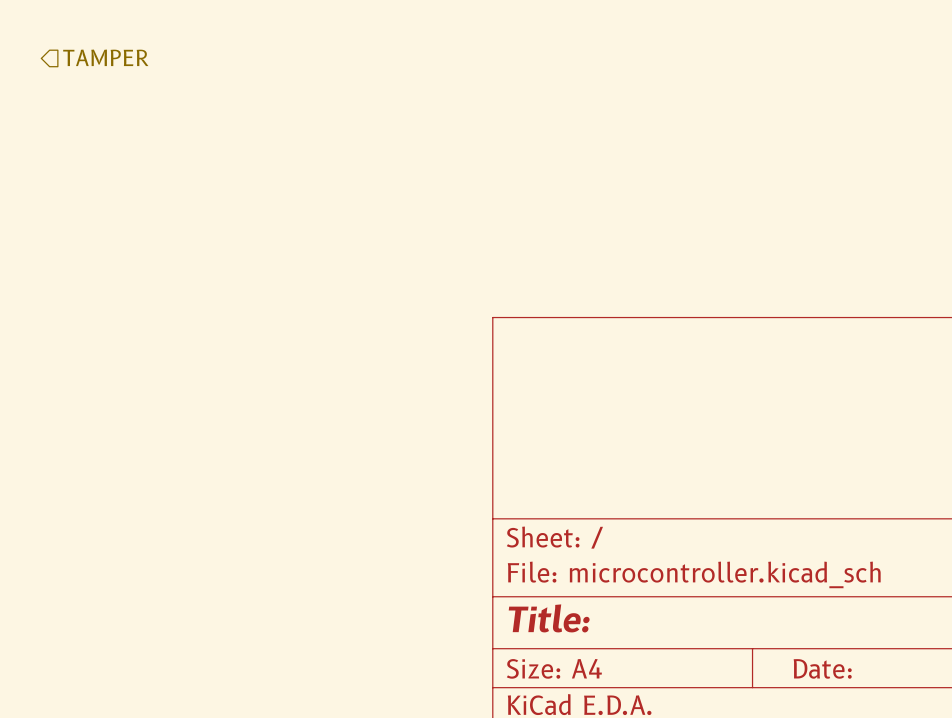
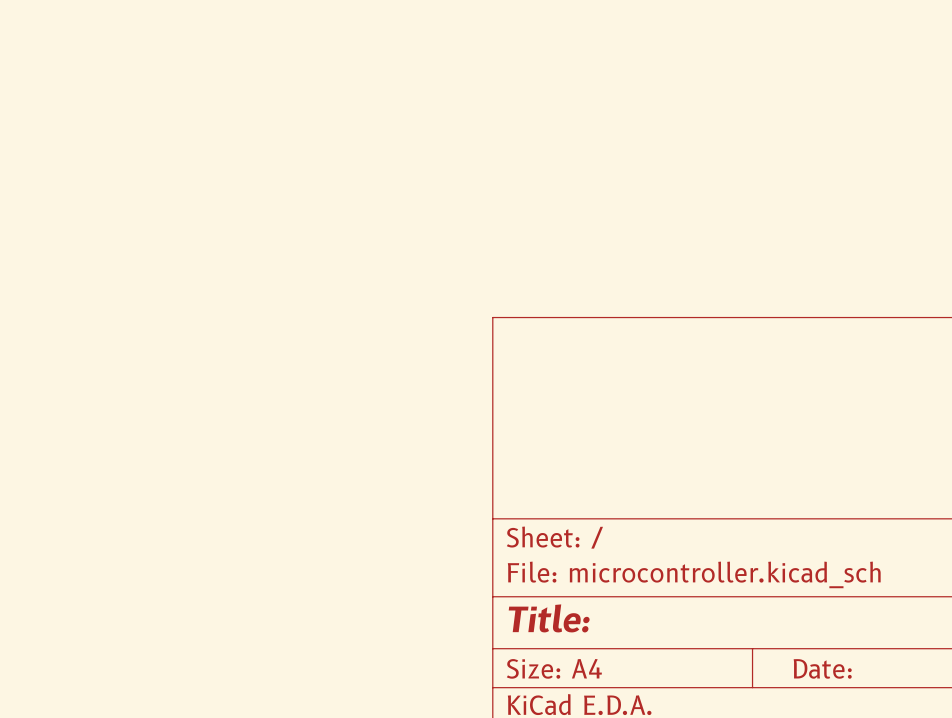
hierarchical label: TAMPER (105, 57) -> none

